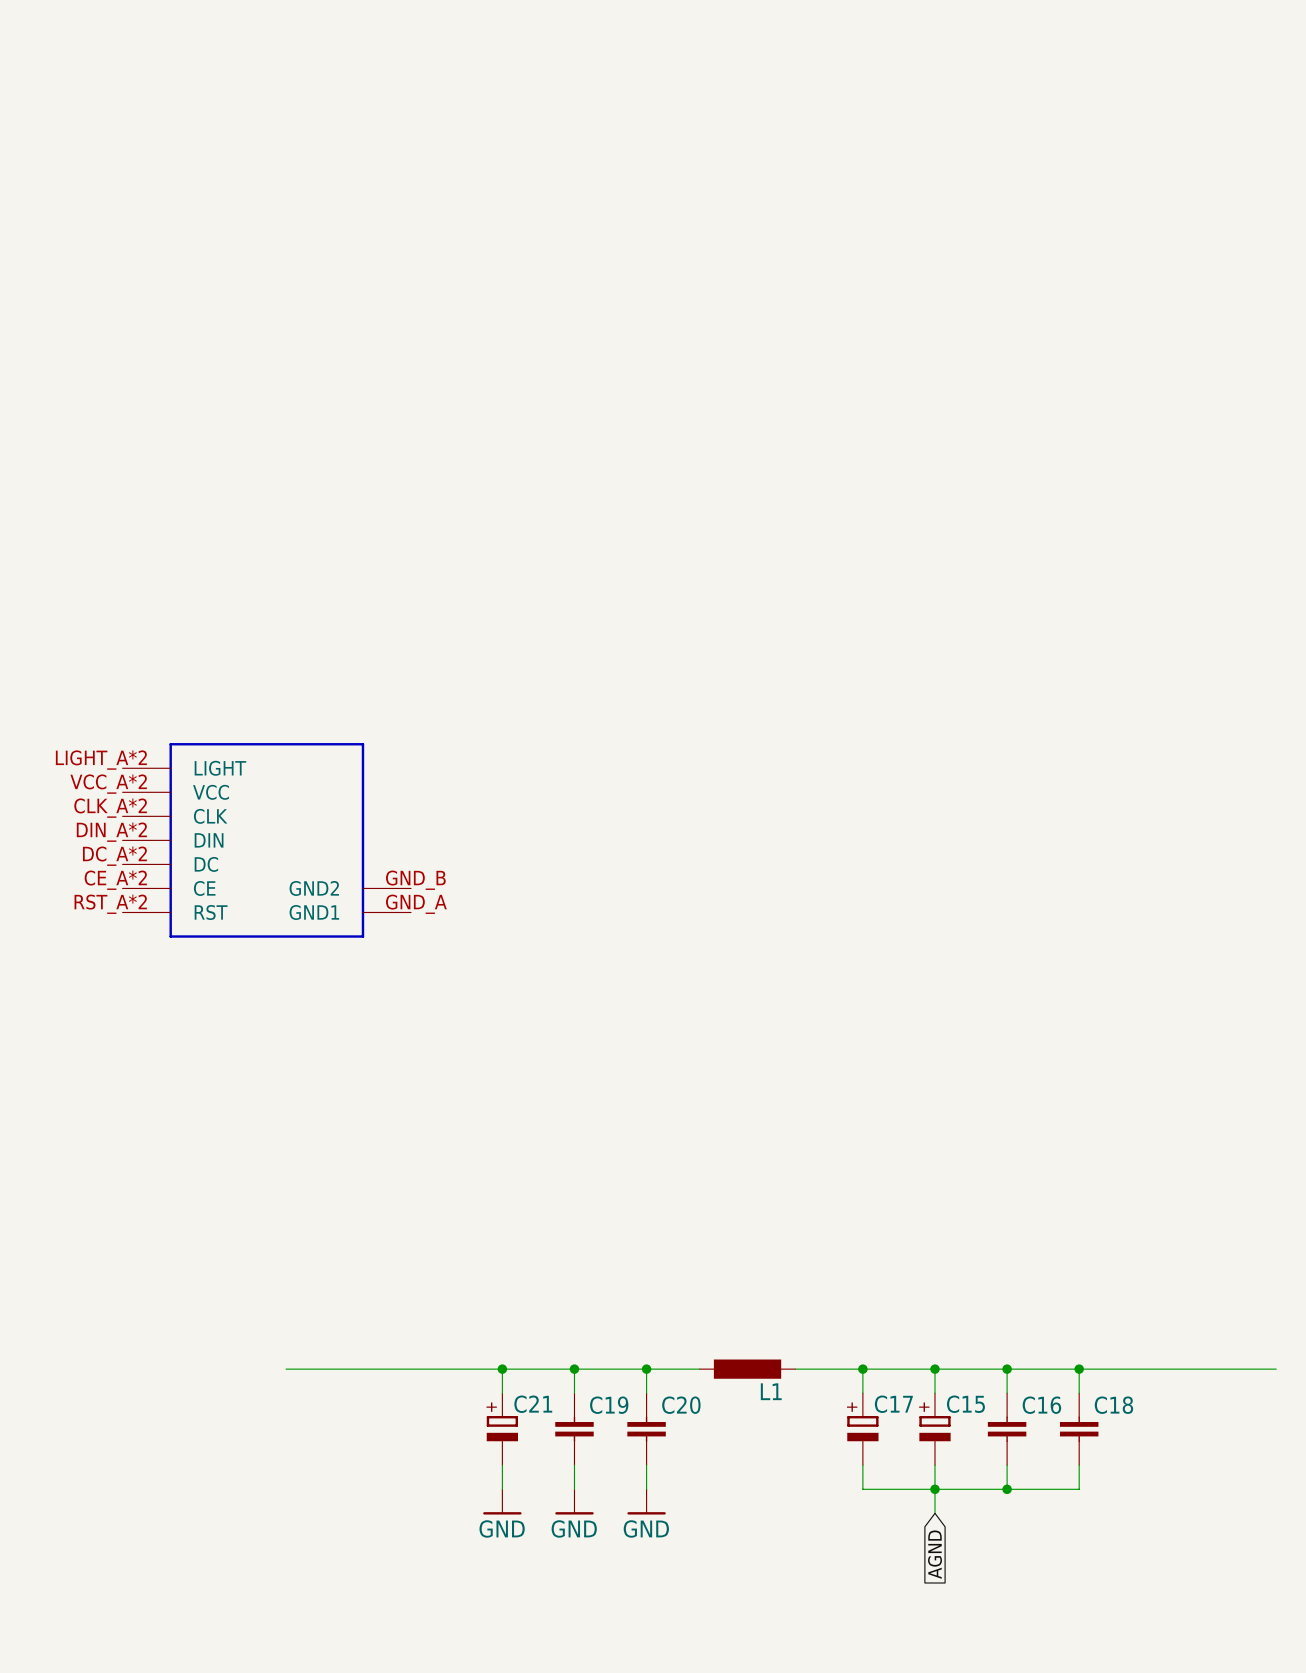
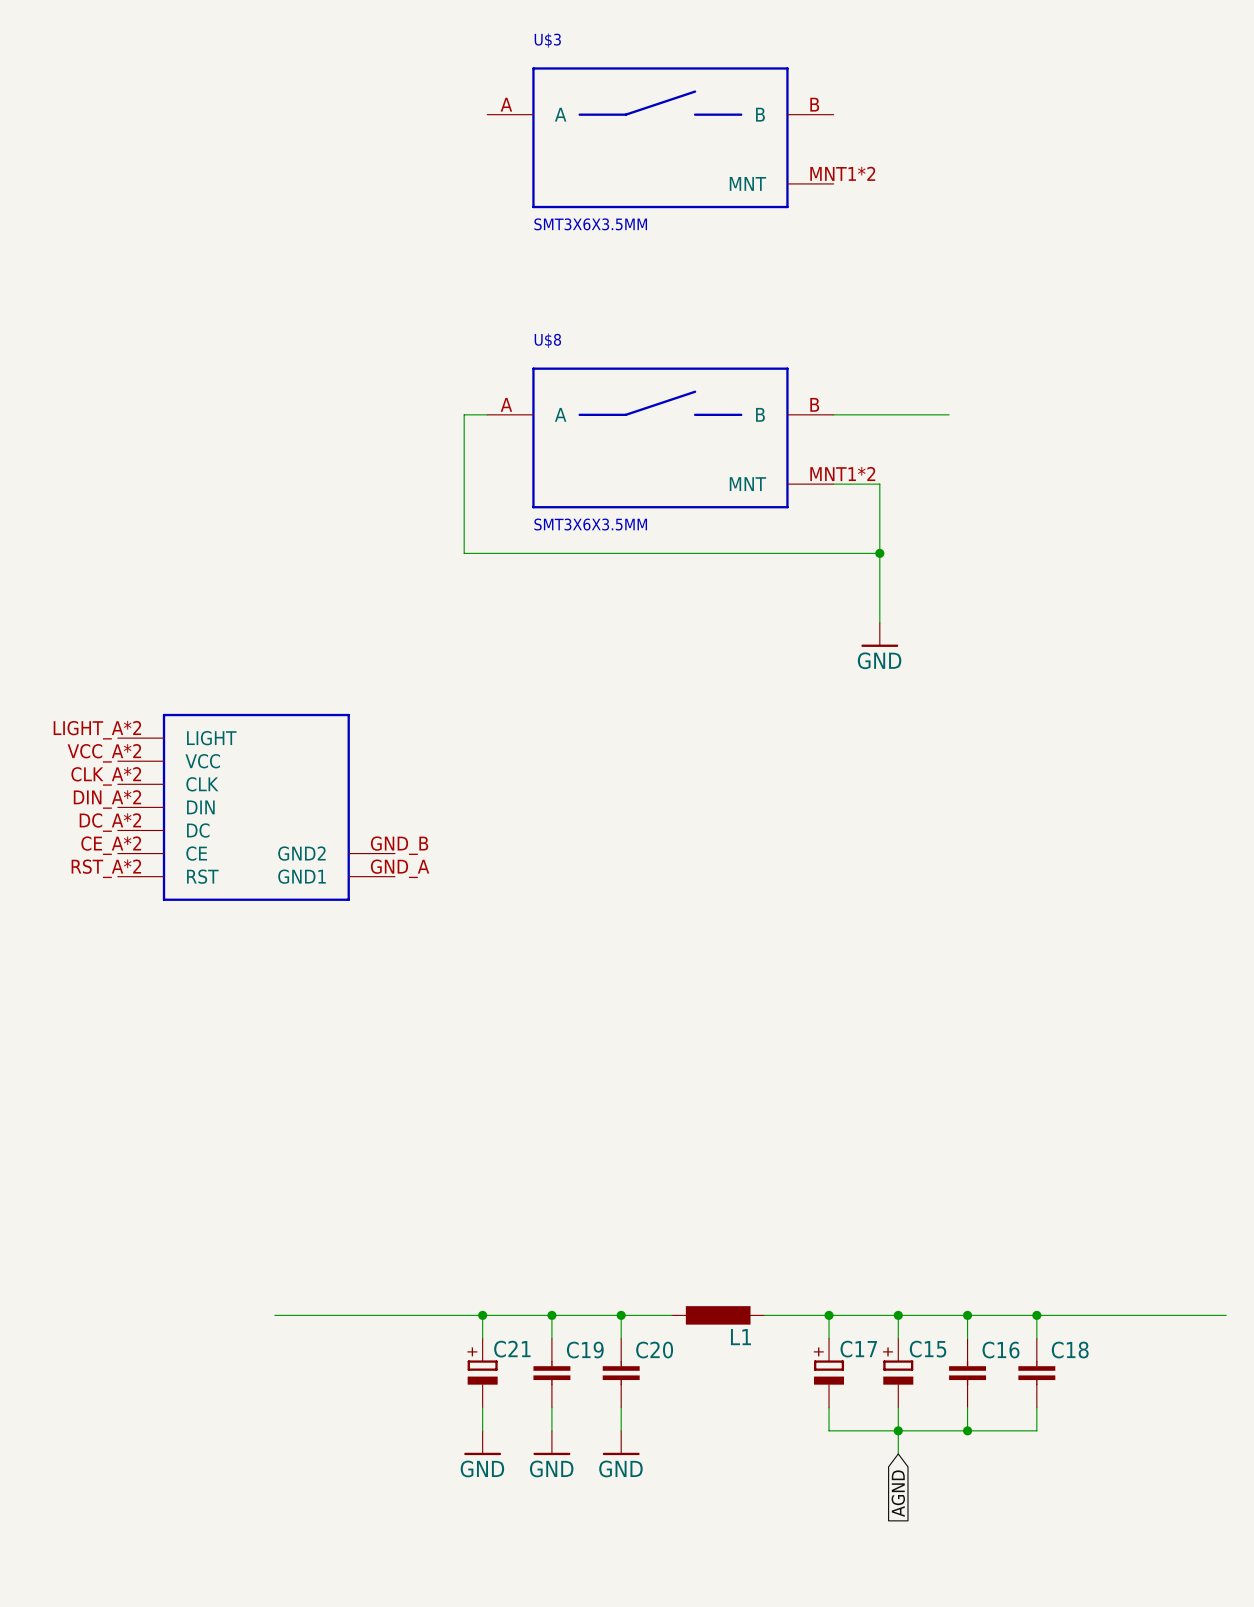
U$3: none -> SMT3X6X3.5MM (660, 137)
wire: none -> (487, 414) (464, 414) (464, 553) (879, 553)
wire: none -> (833, 414) (949, 414)
U$8: none -> SMT3X6X3.5MM (660, 437)
wire: none -> (833, 484) (879, 484) (879, 622)
junction: none -> (879, 553)
power symbol: none -> GND (879, 634)

